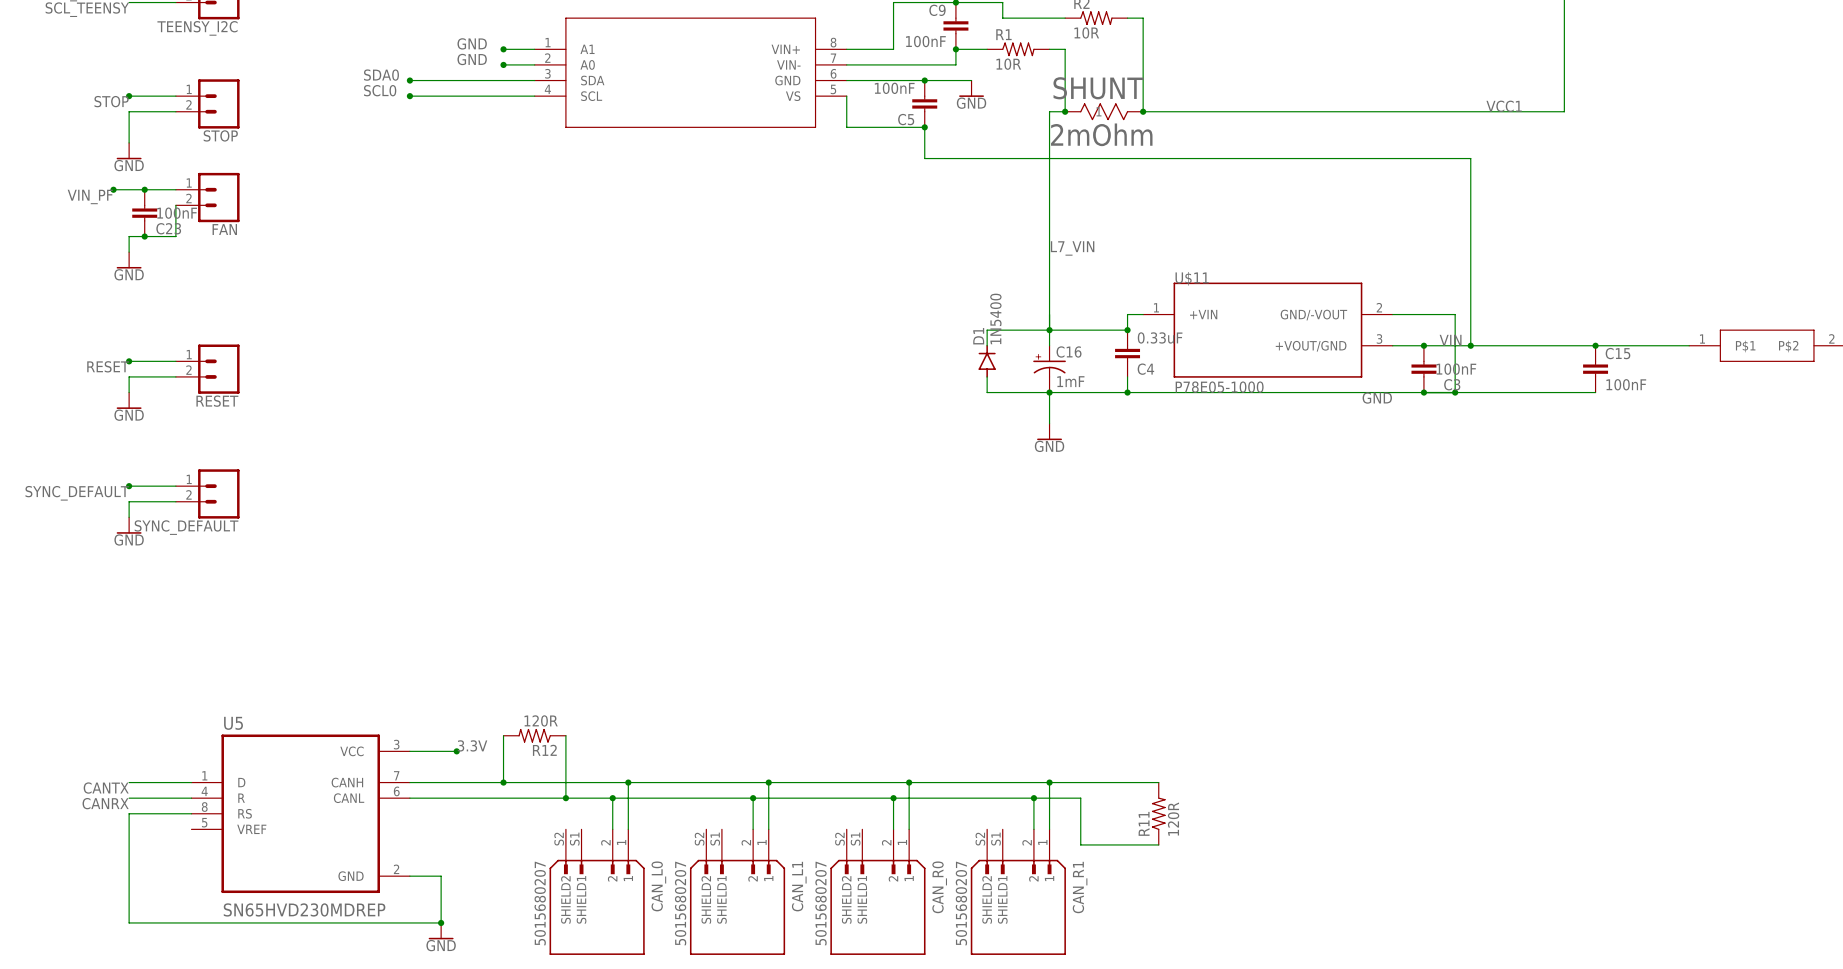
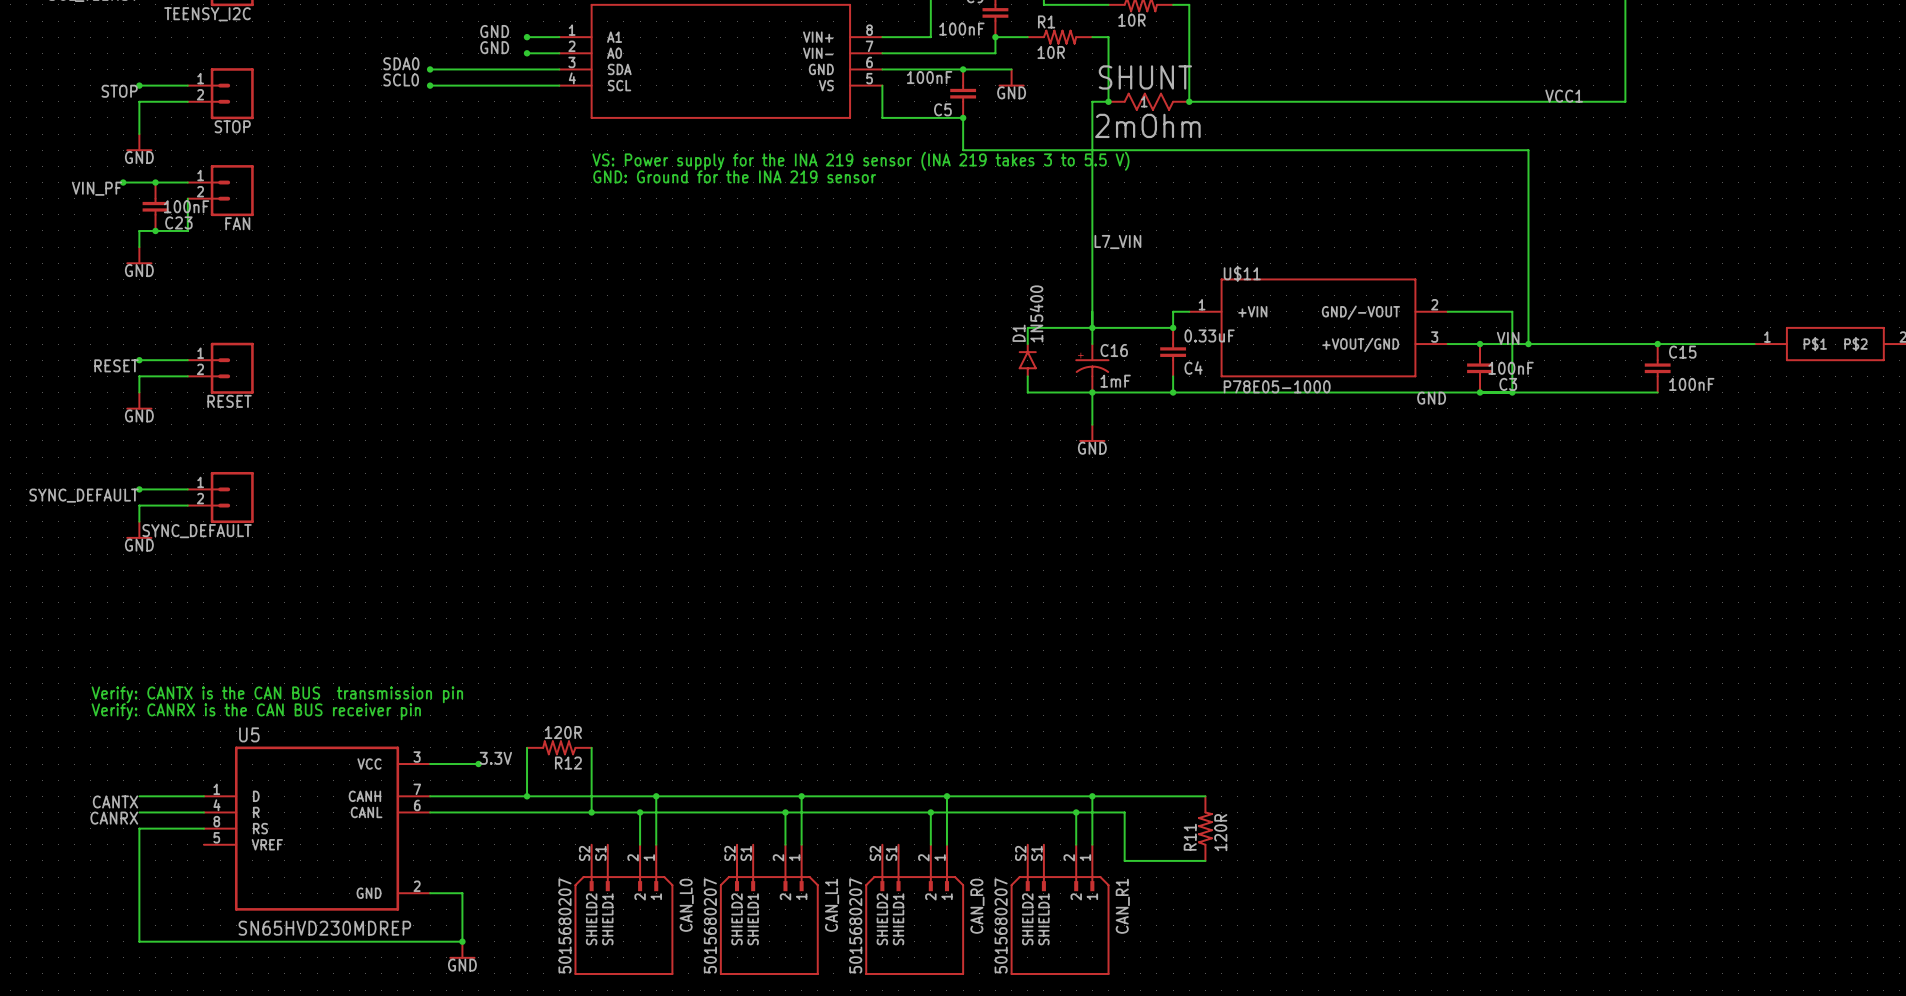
text: none -> VS: Power supply for the INA 219 sensor (INA 219 takes 3 to 5.5 V) (860, 161)
text: none -> GND: Ground for the INA 219 sensor (734, 176)
text: none -> Verify: CANTX is the CAN BUS transmission pin (277, 694)
text: none -> Verify: CANRX is the CAN BUS receiver pin (256, 711)

